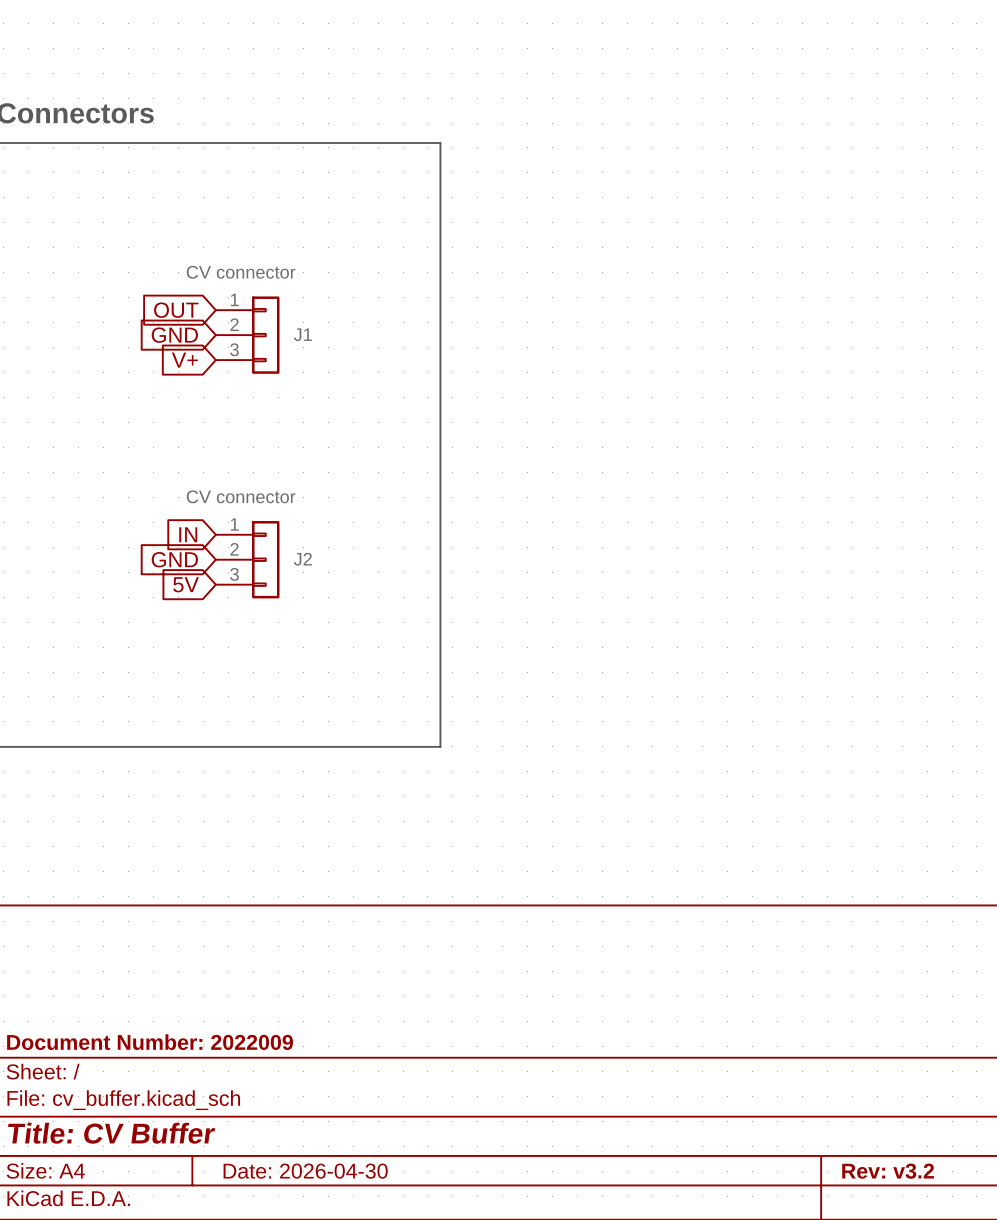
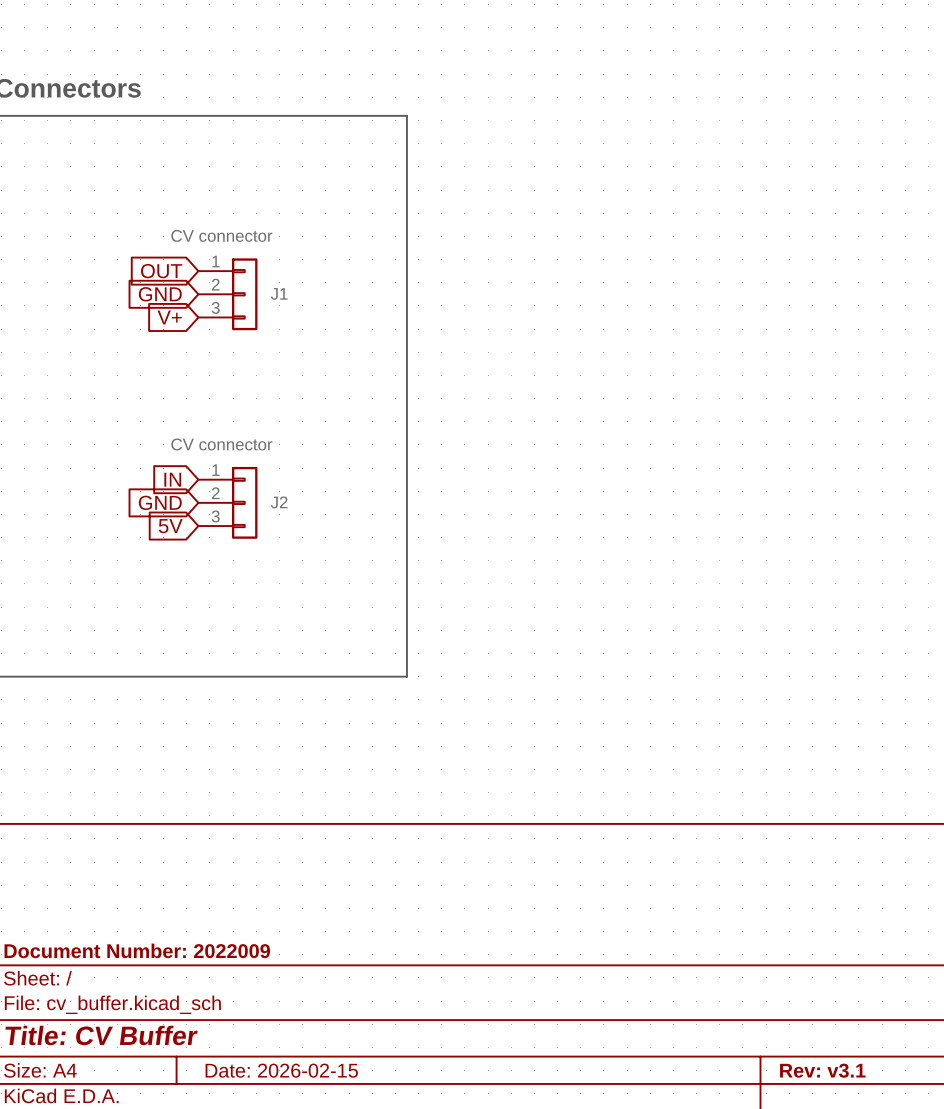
title block: Date: 2026-04-30 (305, 1171) -> Date: 2026-02-15 (281, 1070)
title block: Rev: v3.2 (888, 1171) -> Rev: v3.1 (822, 1070)

